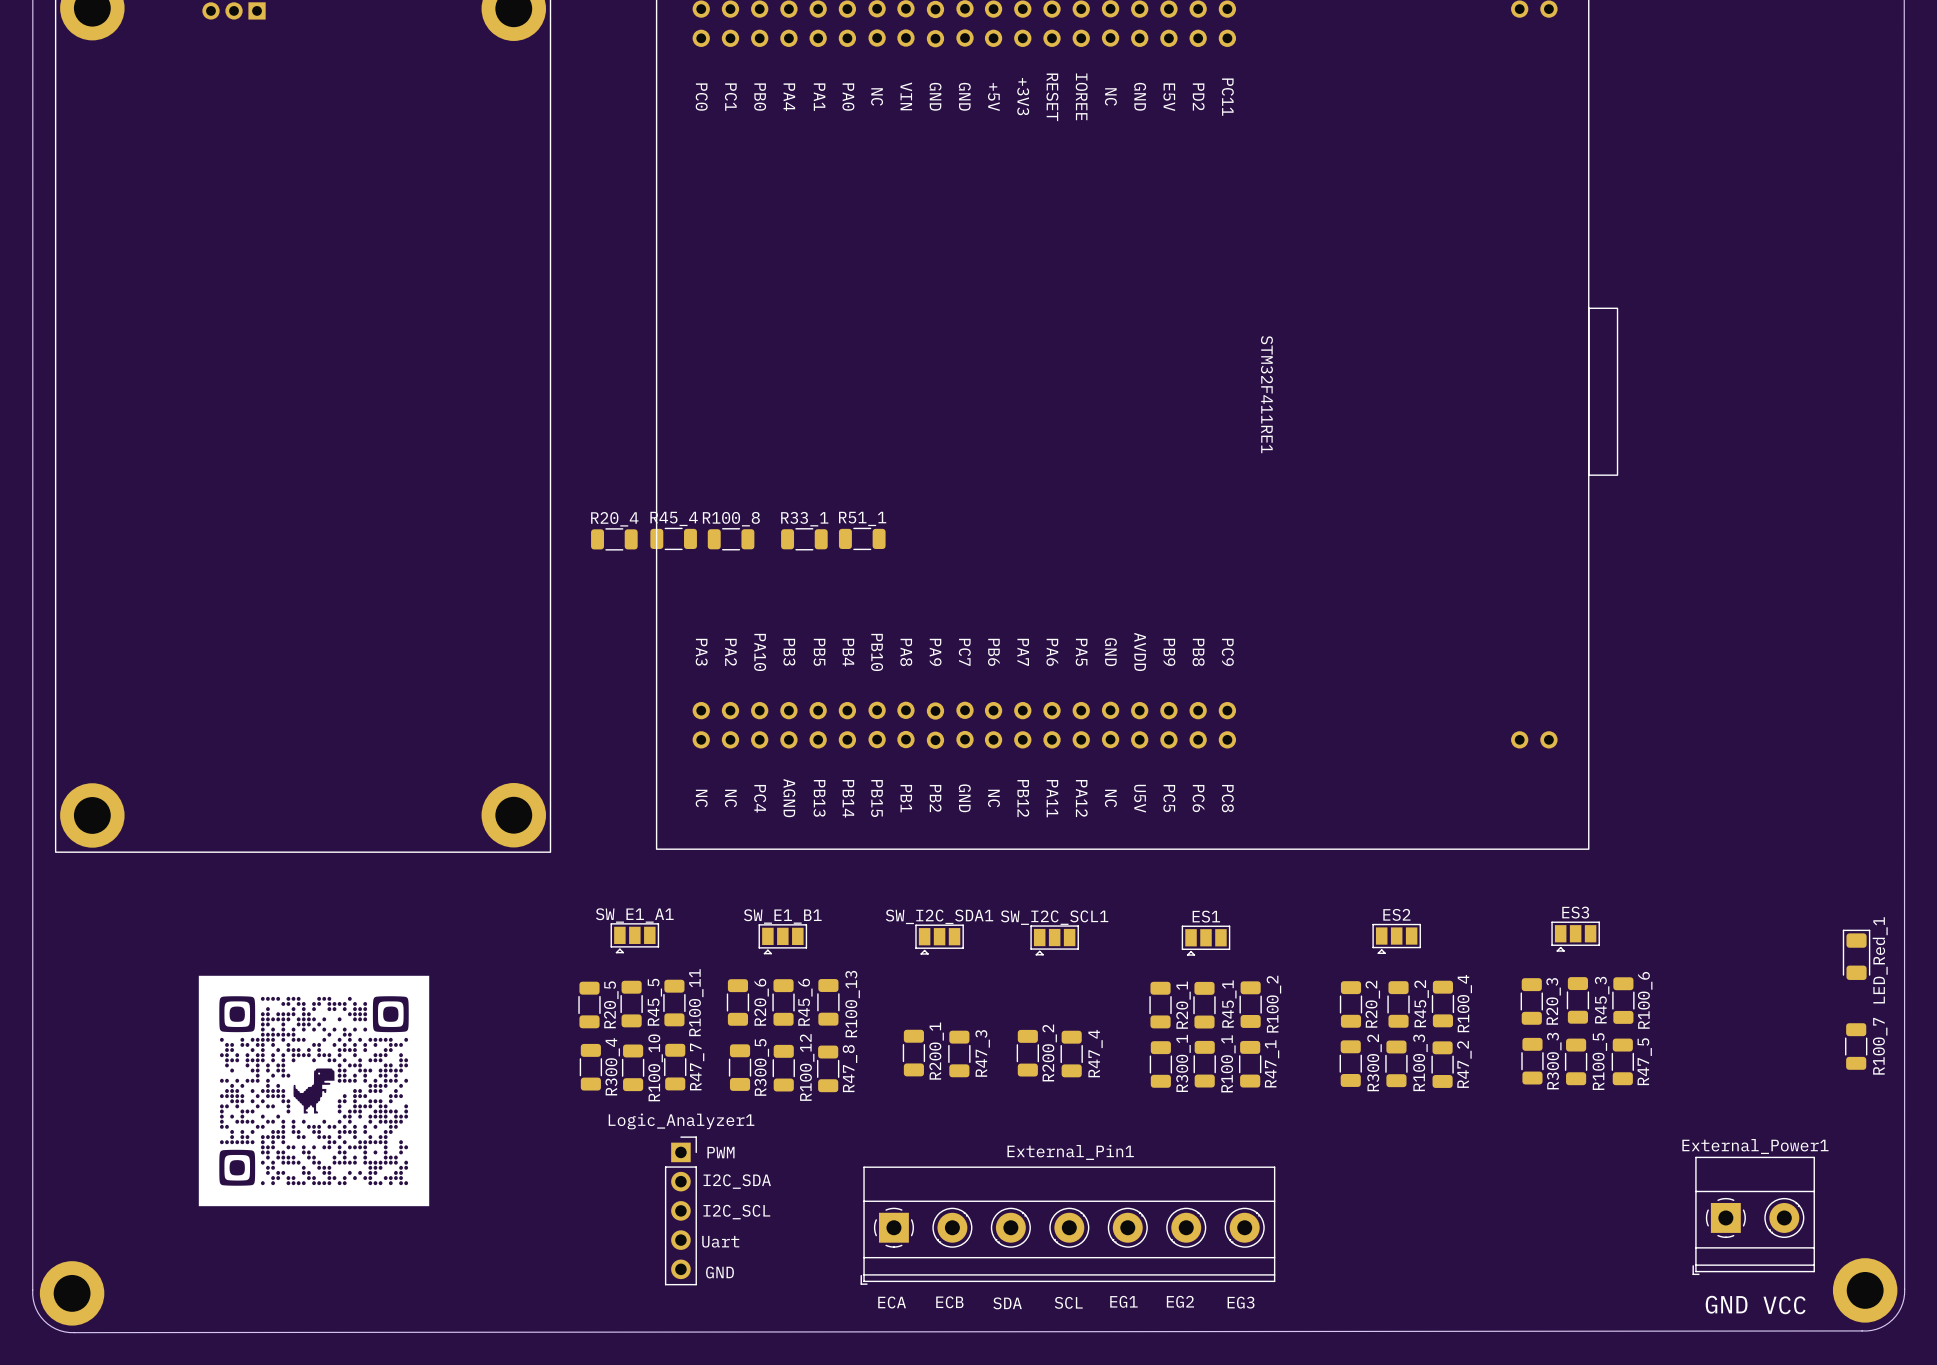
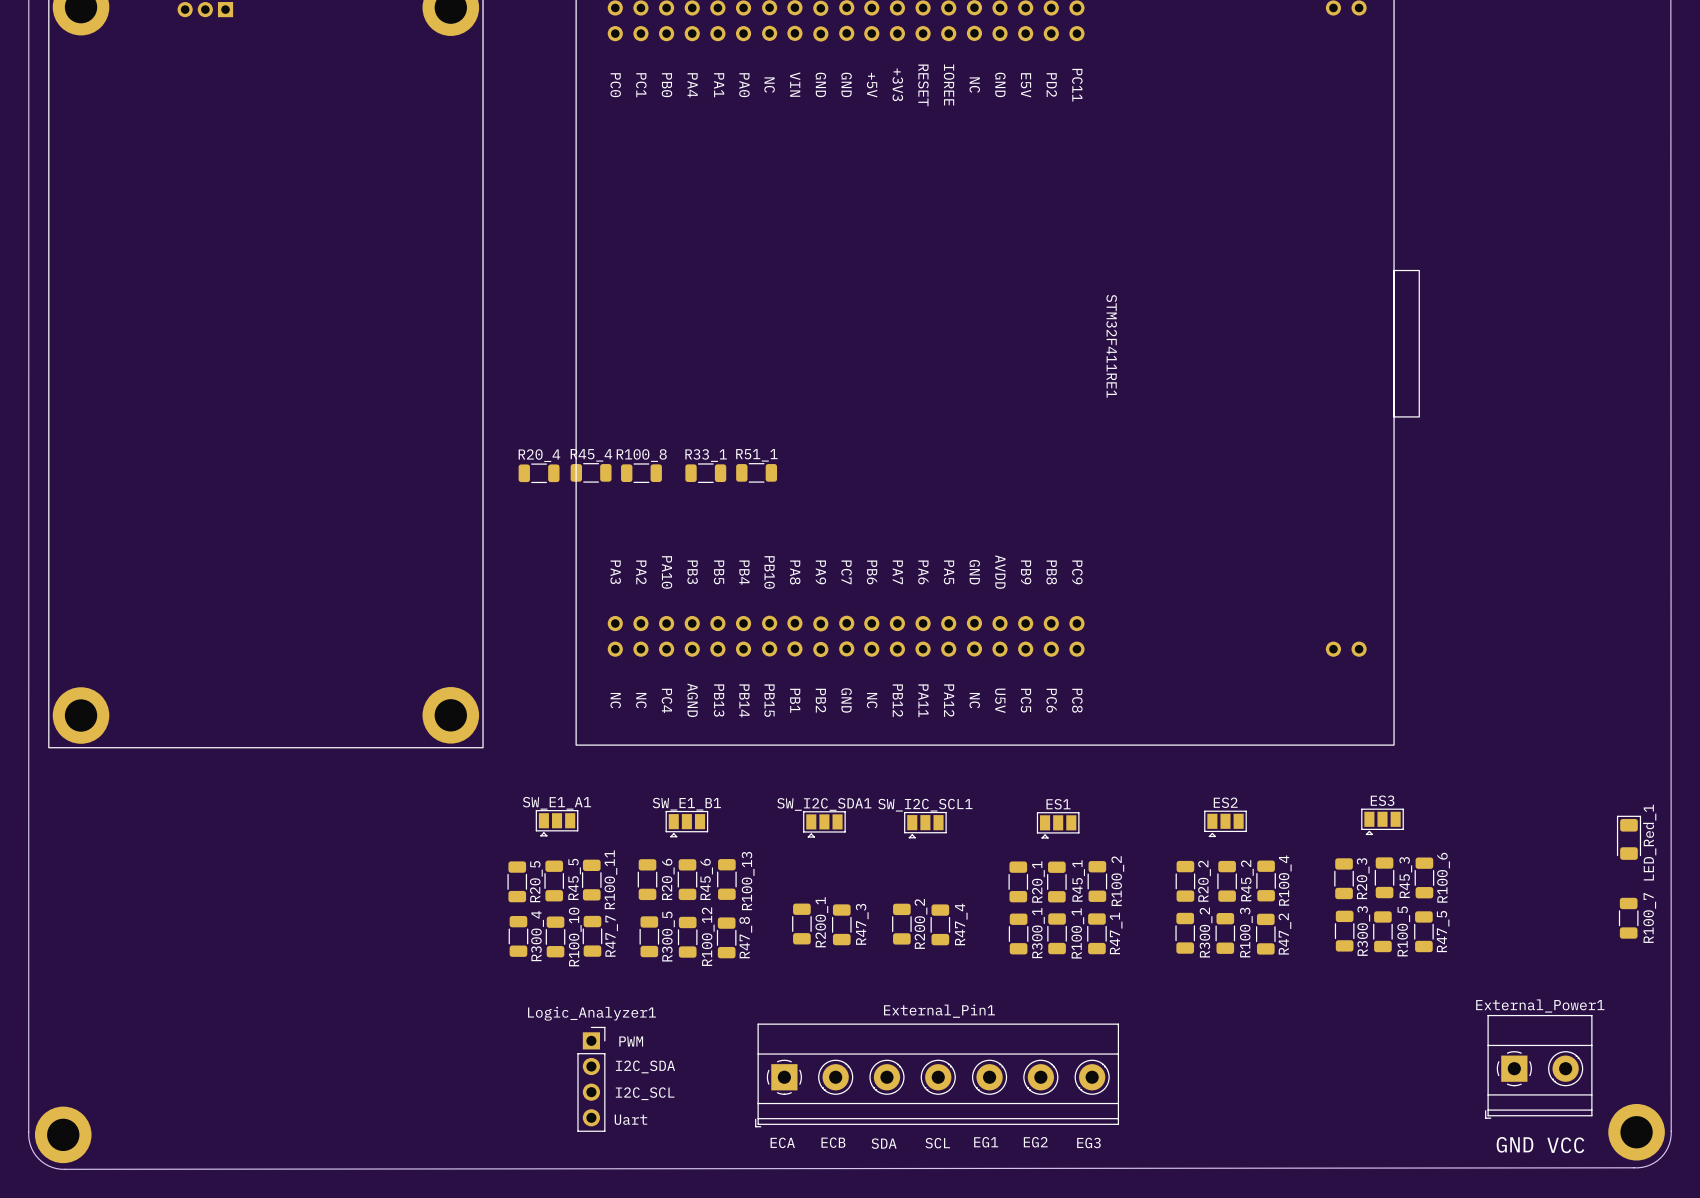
drawing: [198, 975, 430, 1207] -> none
Logic_Analyzer1 footprint: [664, 1136, 697, 1286] -> [577, 1026, 606, 1132]
text position: PWM (720, 1152) -> PWM (631, 1041)
text: I2C_SDA (737, 1181) -> none
text: I2C_SCL (736, 1212) -> I2C_SDA (645, 1066)
text: Uart (720, 1241) -> none
text: none -> I2C_SCL (645, 1093)
text: GND (720, 1272) -> Uart (630, 1119)

